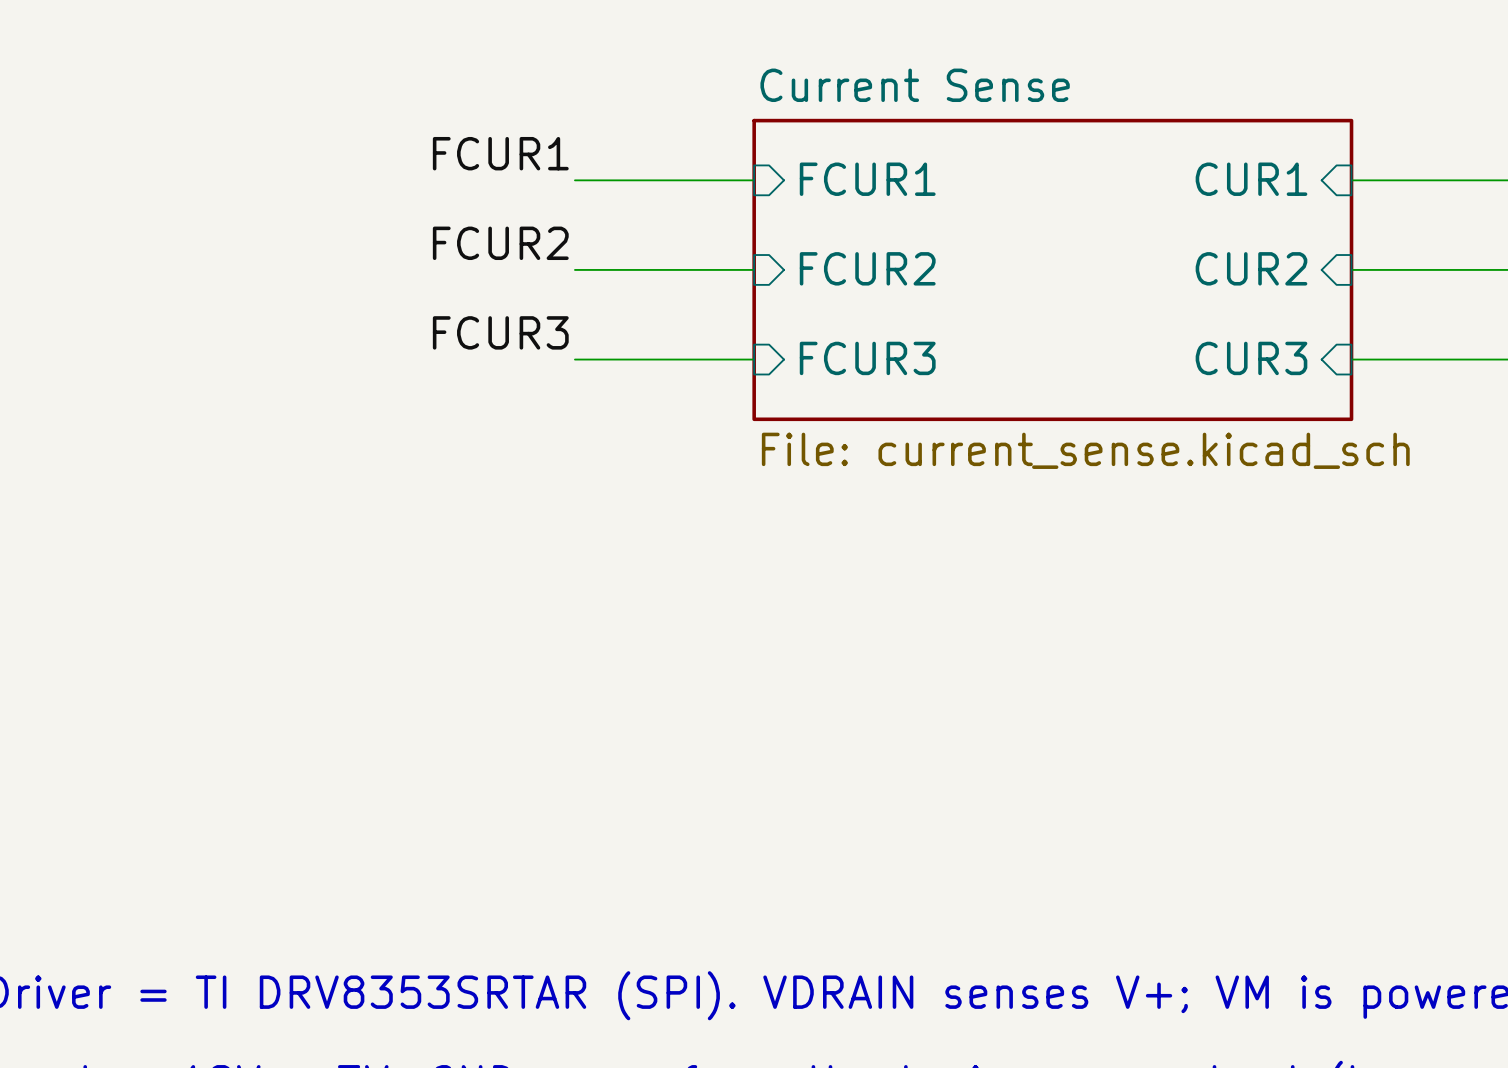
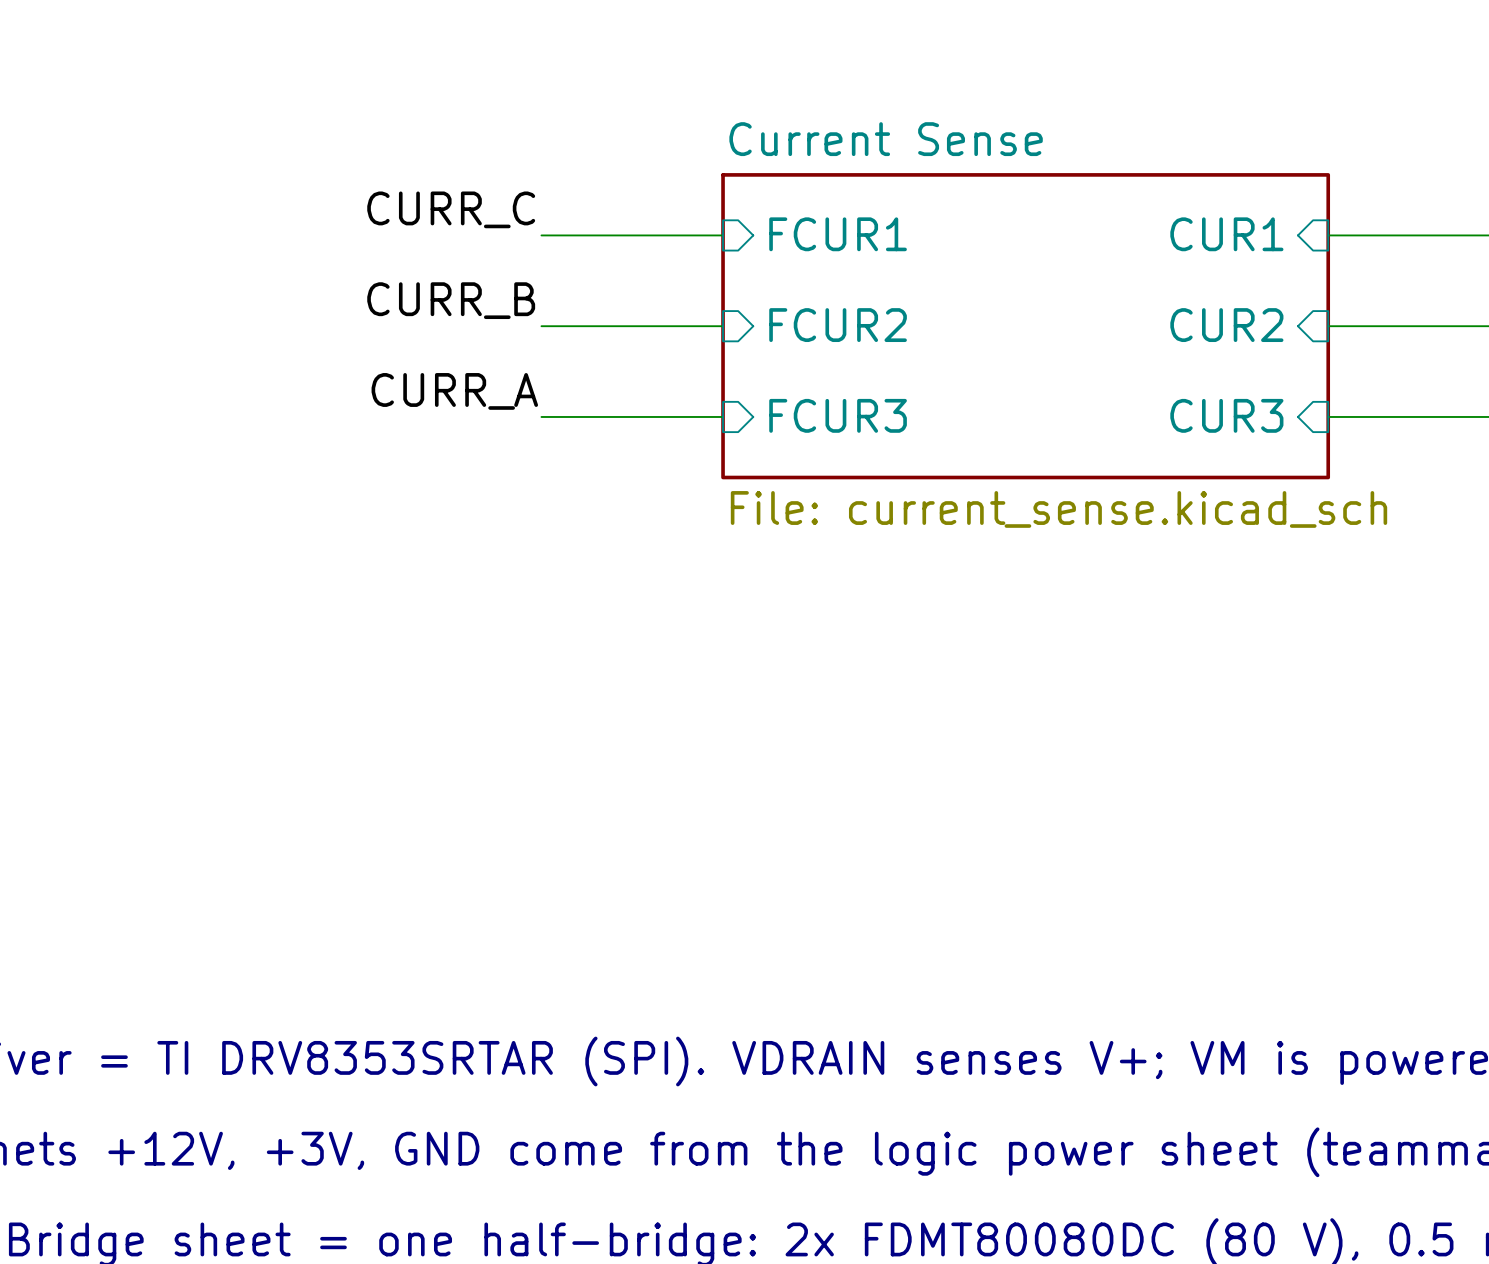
label: FCUR1 (500, 153) -> CURR_C (451, 209)
label: FCUR2 (500, 243) -> CURR_B (451, 300)
label: FCUR3 (500, 332) -> CURR_A (454, 391)

